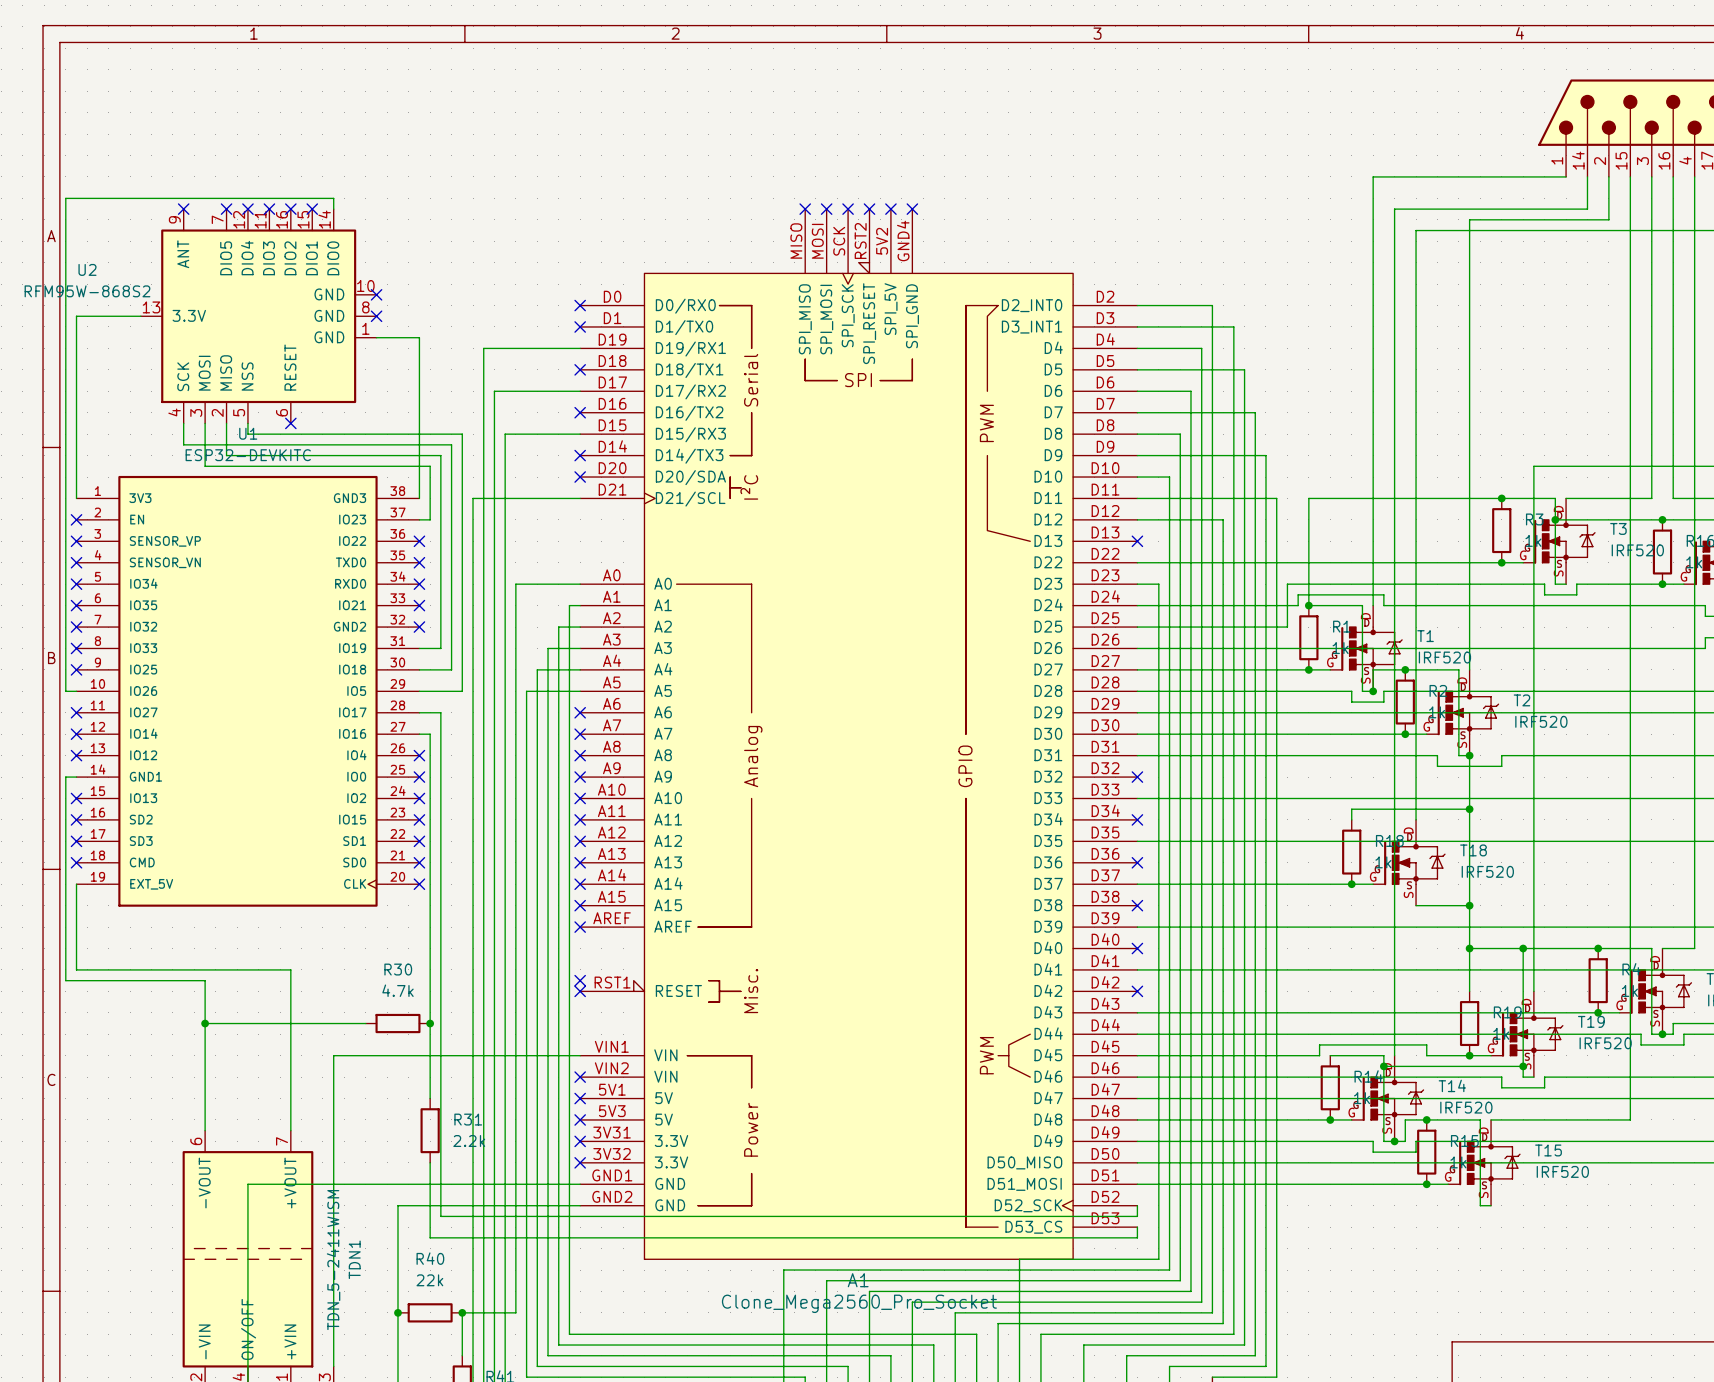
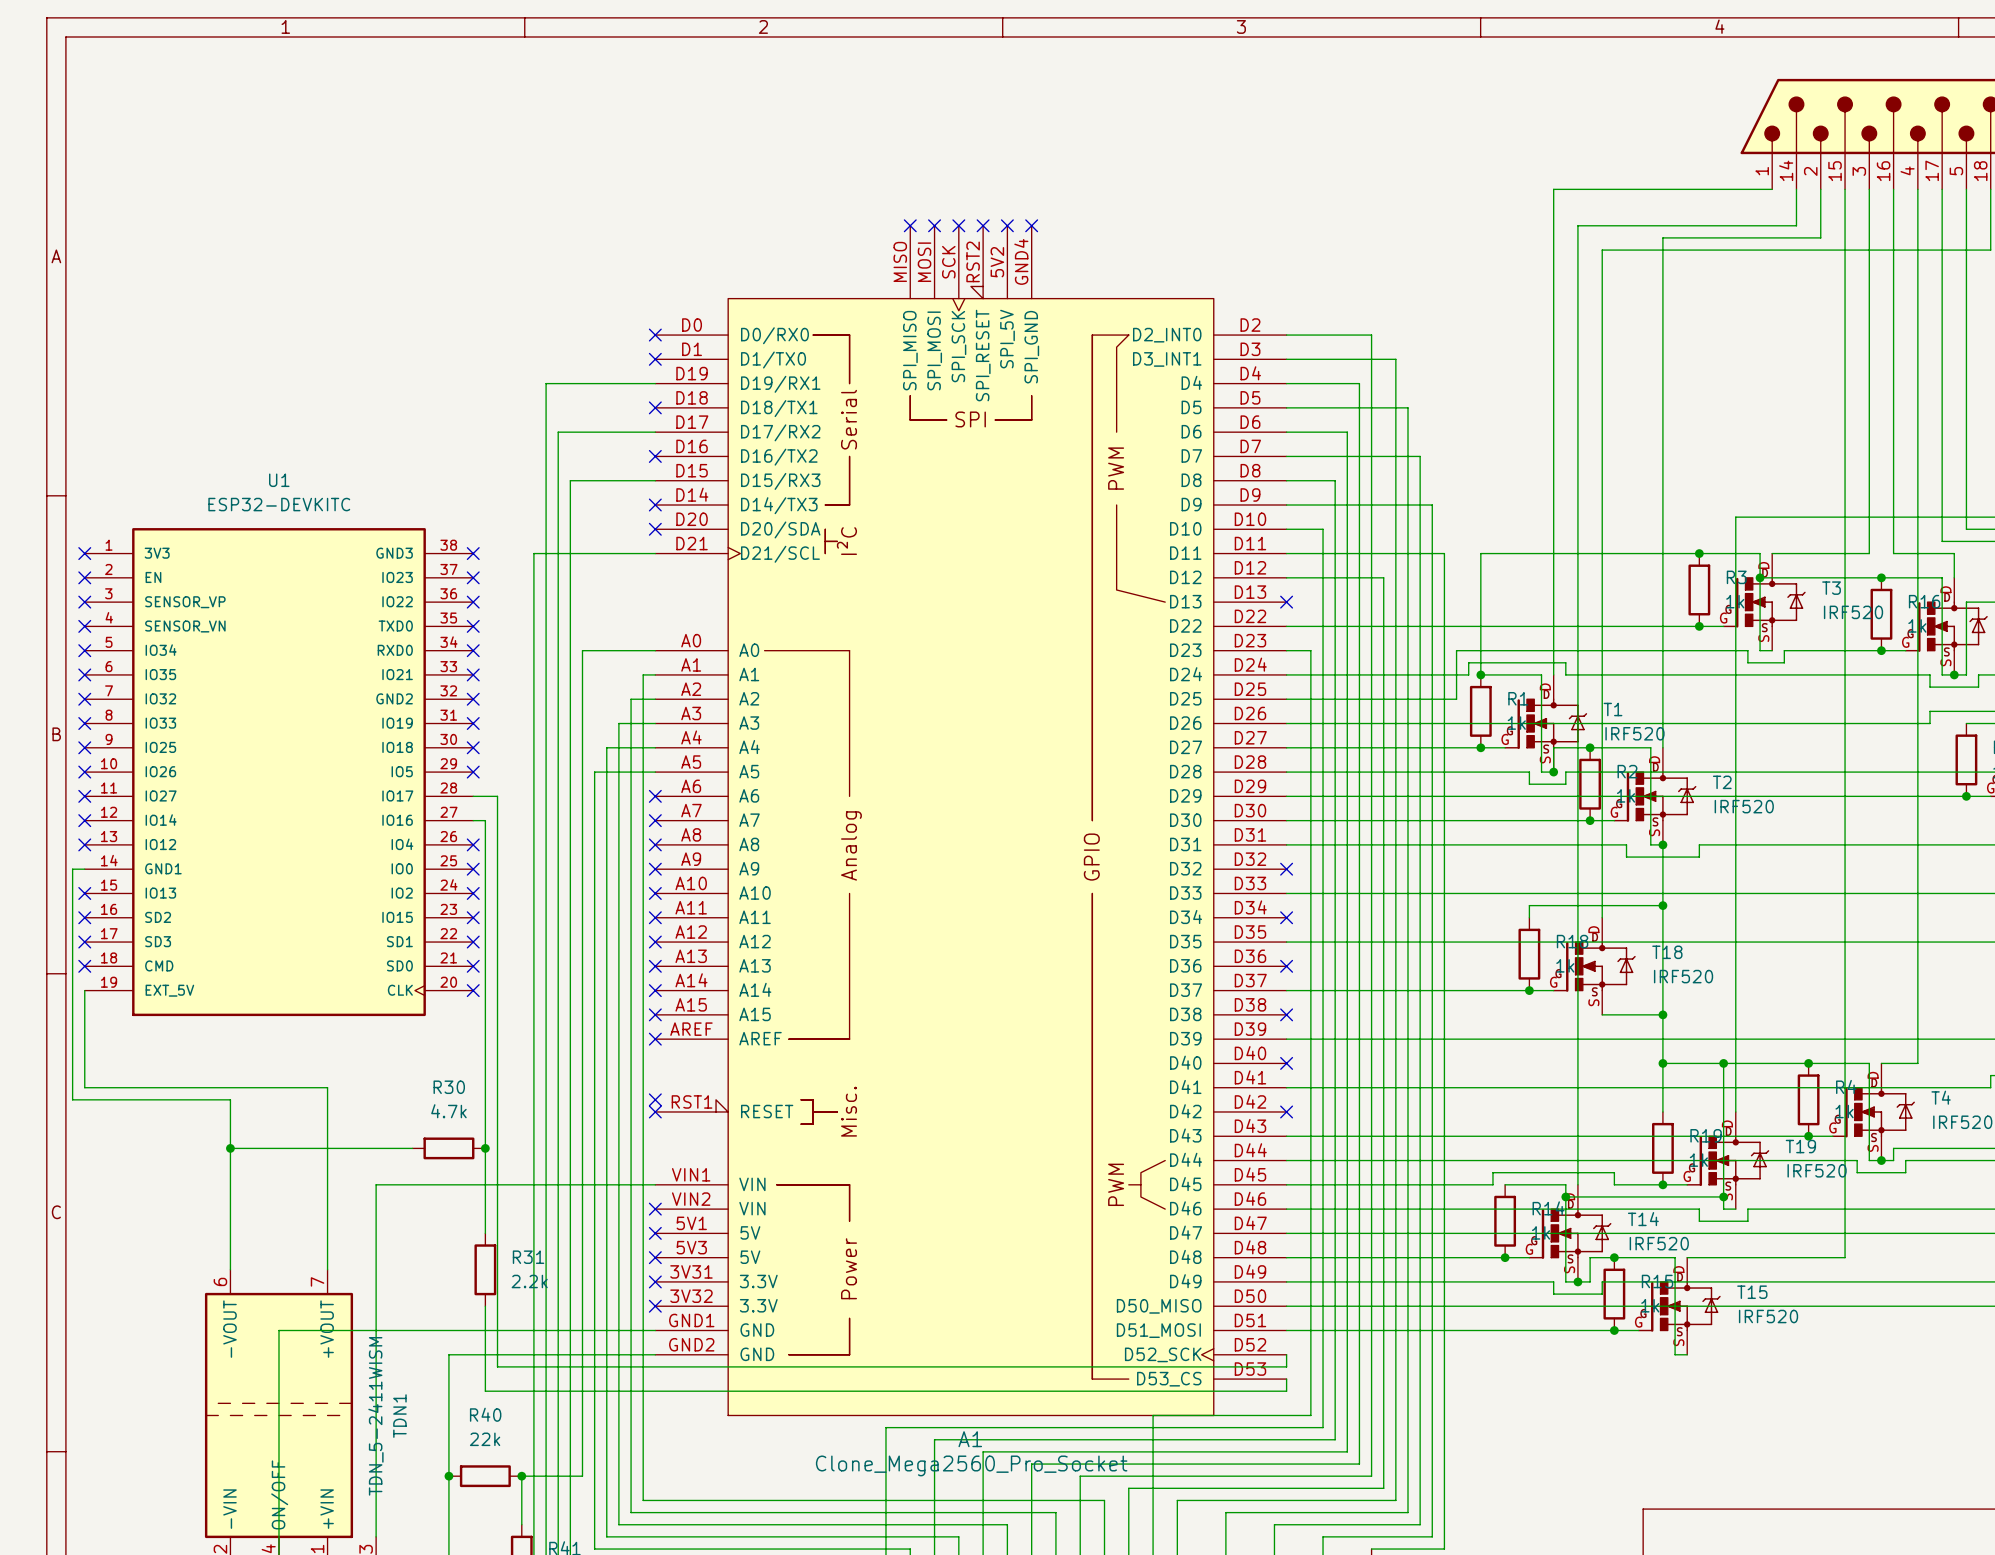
no-connect mark: (183, 209) -> none
no-connect mark: (226, 209) -> none
no-connect mark: (247, 209) -> none
no-connect mark: (269, 209) -> none
no-connect mark: (290, 209) -> none
no-connect mark: (312, 209) -> none
wire: (333, 209) (333, 198) (65, 198) (65, 691) (76, 691) -> none
no-connect mark: (376, 294) -> none
wire: (140, 316) (76, 316) (76, 498) -> none
U2: RFM95W-868S2 (258, 316) -> none
no-connect mark: (376, 316) -> none
wire: (376, 337) (419, 337) (419, 498) -> none
wire: (183, 423) (183, 444) (451, 444) (451, 669) (419, 669) -> none
wire: (205, 423) (205, 466) (430, 466) (430, 519) (419, 519) -> none
wire: (226, 423) (226, 455) (440, 455) (440, 648) (419, 648) -> none
wire: (247, 423) (247, 434) (462, 434) (462, 691) (419, 691) -> none
no-connect mark: (290, 423) -> none
no-connect mark: none -> (84, 553)
no-connect mark: none -> (473, 553)
no-connect mark: none -> (473, 577)
no-connect mark: none -> (473, 723)
no-connect mark: none -> (473, 747)
no-connect mark: none -> (84, 772)
no-connect mark: none -> (473, 772)

